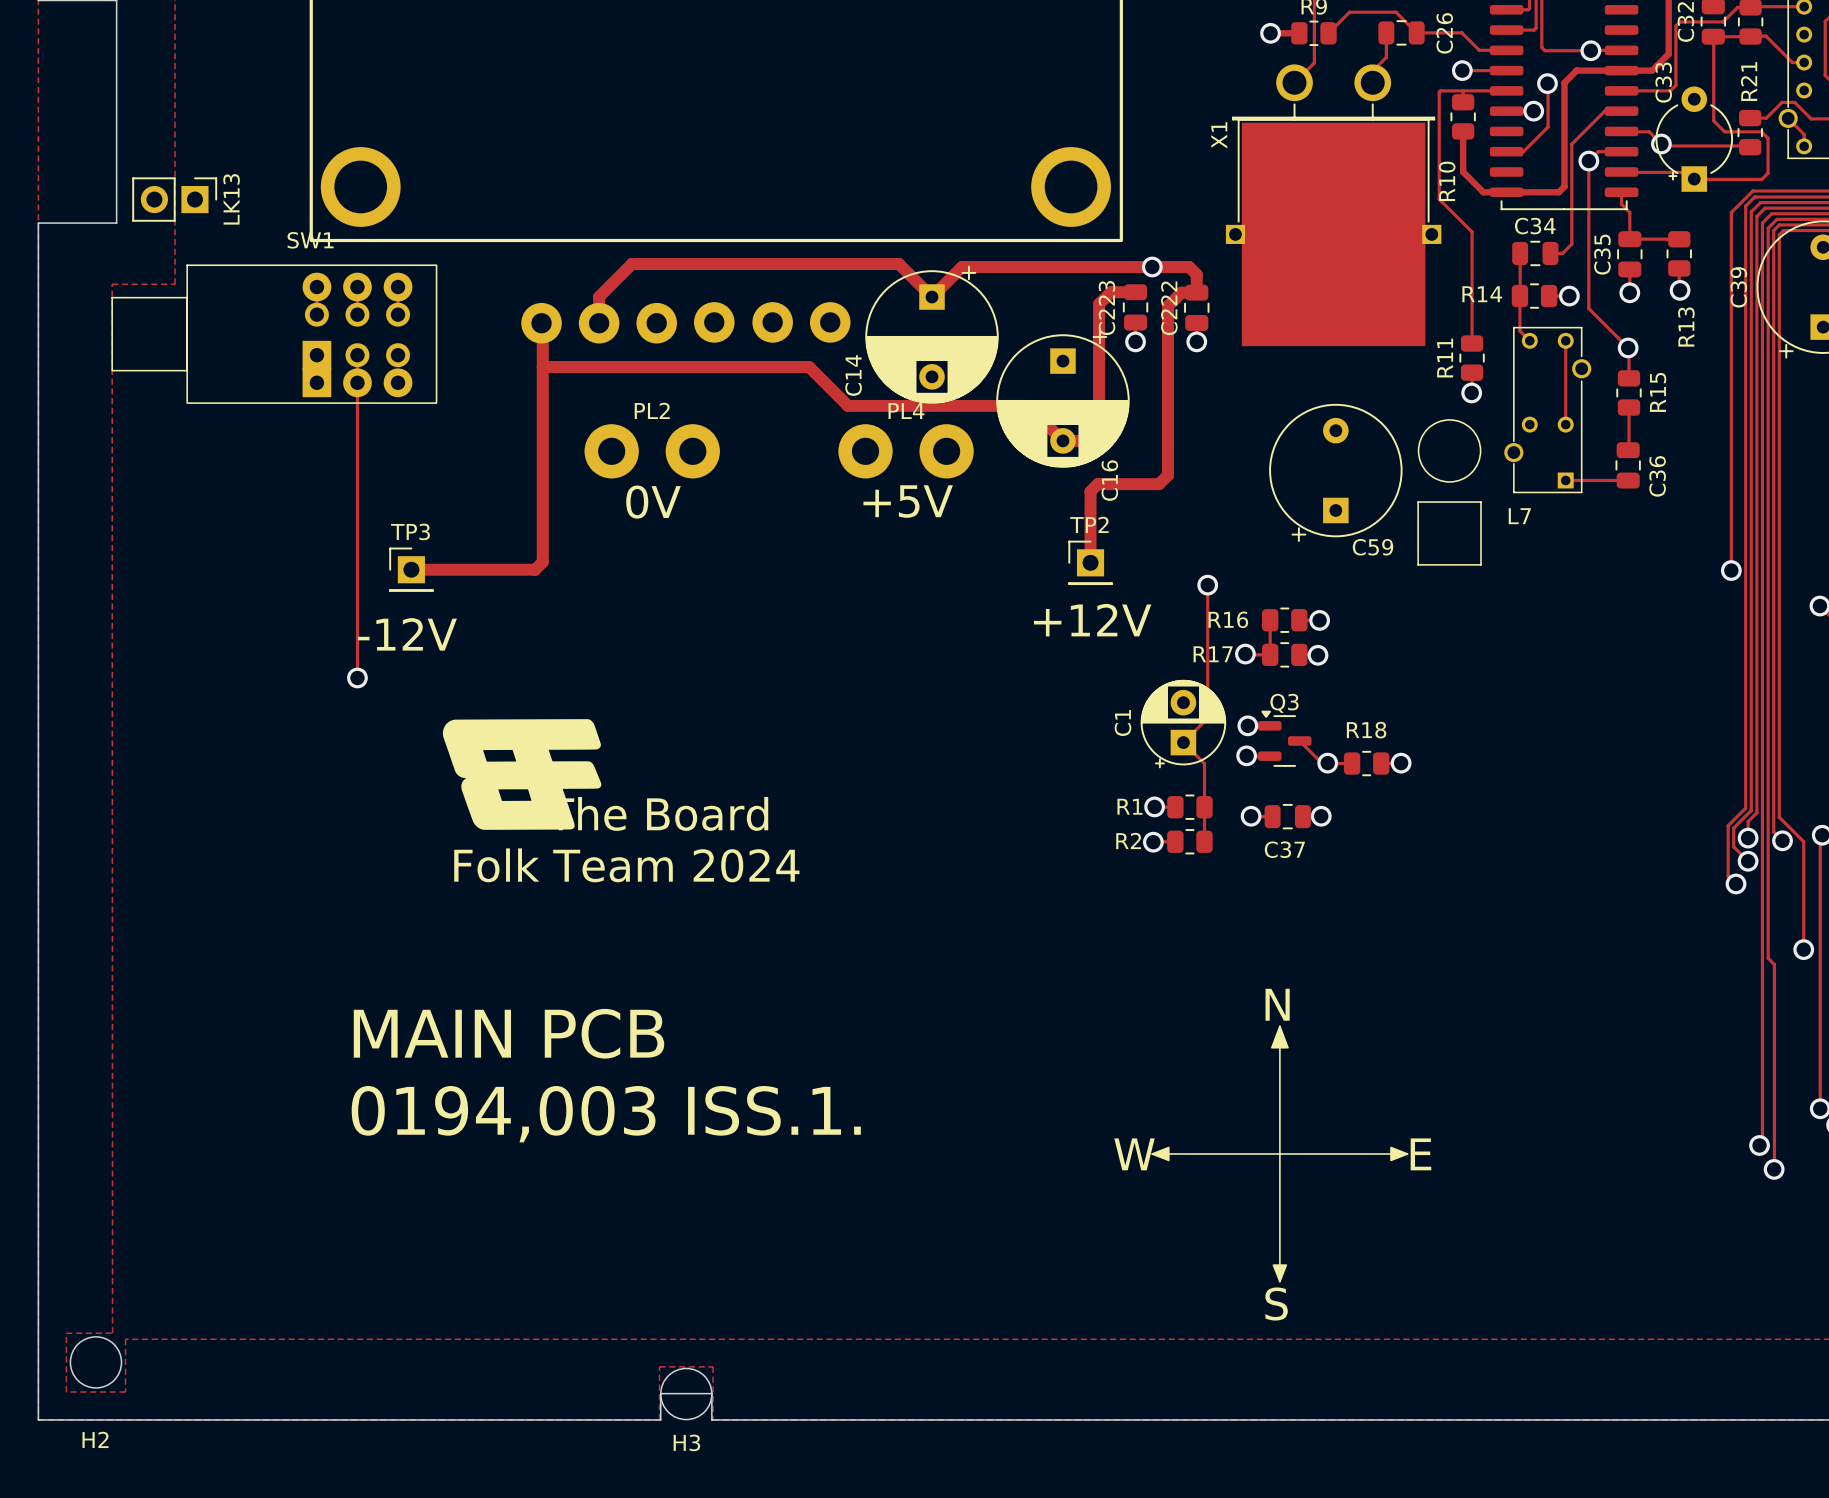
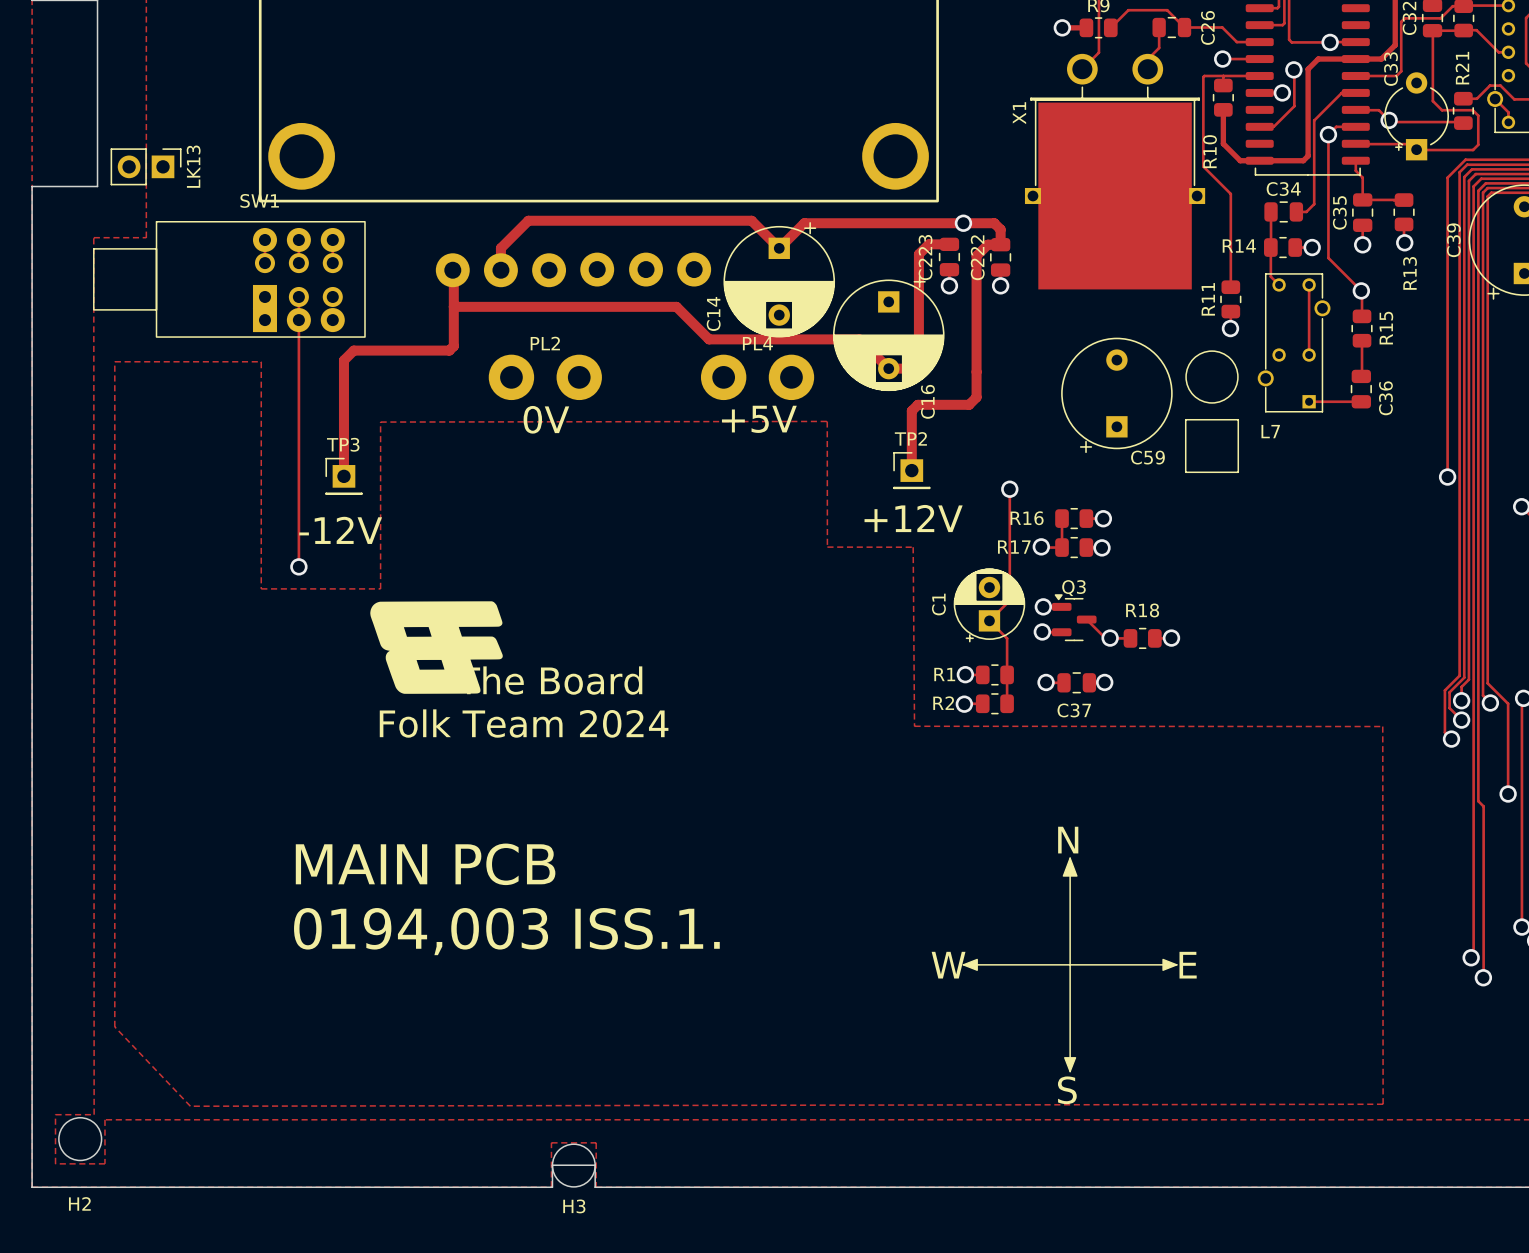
track: (542, 414) (542, 562) (535, 569) (411, 569) -> (453, 346) (449, 350) (353, 350) (343, 360) (343, 476)
zone outline: none -> (114, 361) (114, 1026) (190, 1106) (1383, 1104) (1382, 726) (914, 726) (913, 547) (827, 547) (827, 421) (380, 422) (380, 588) (261, 588) (261, 362) (114, 361)

